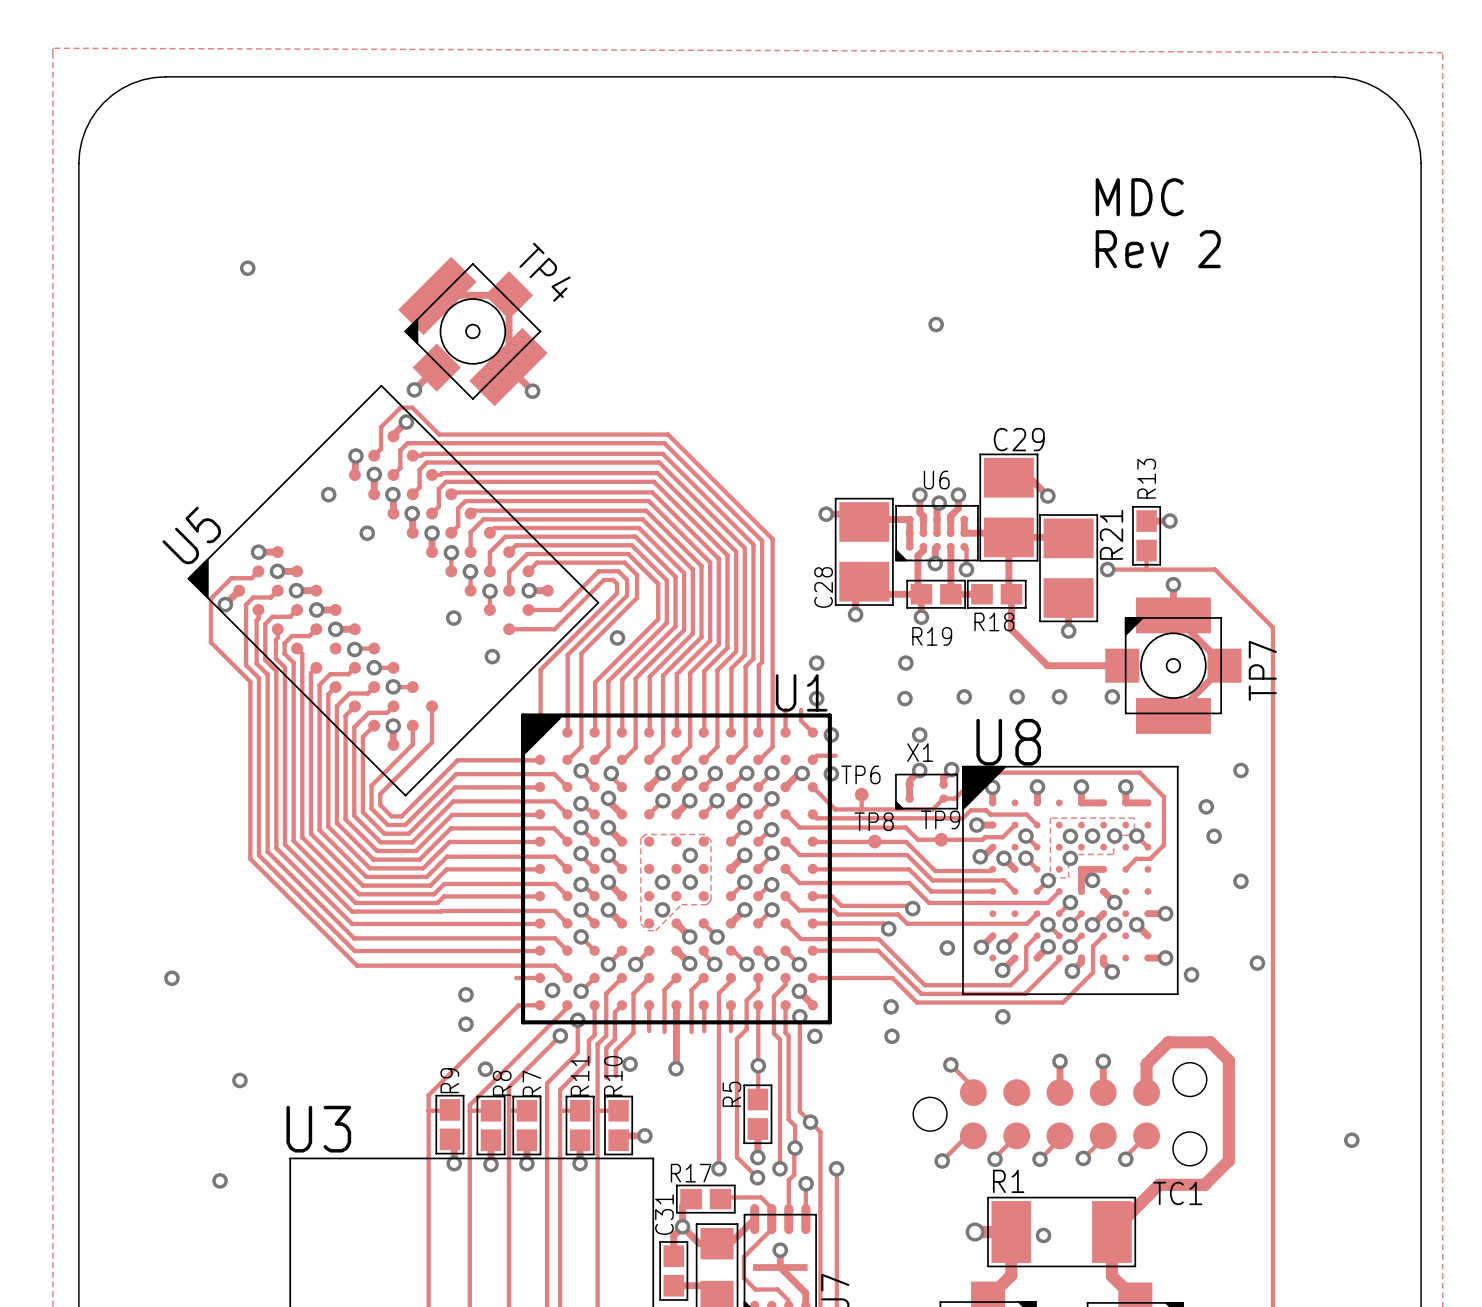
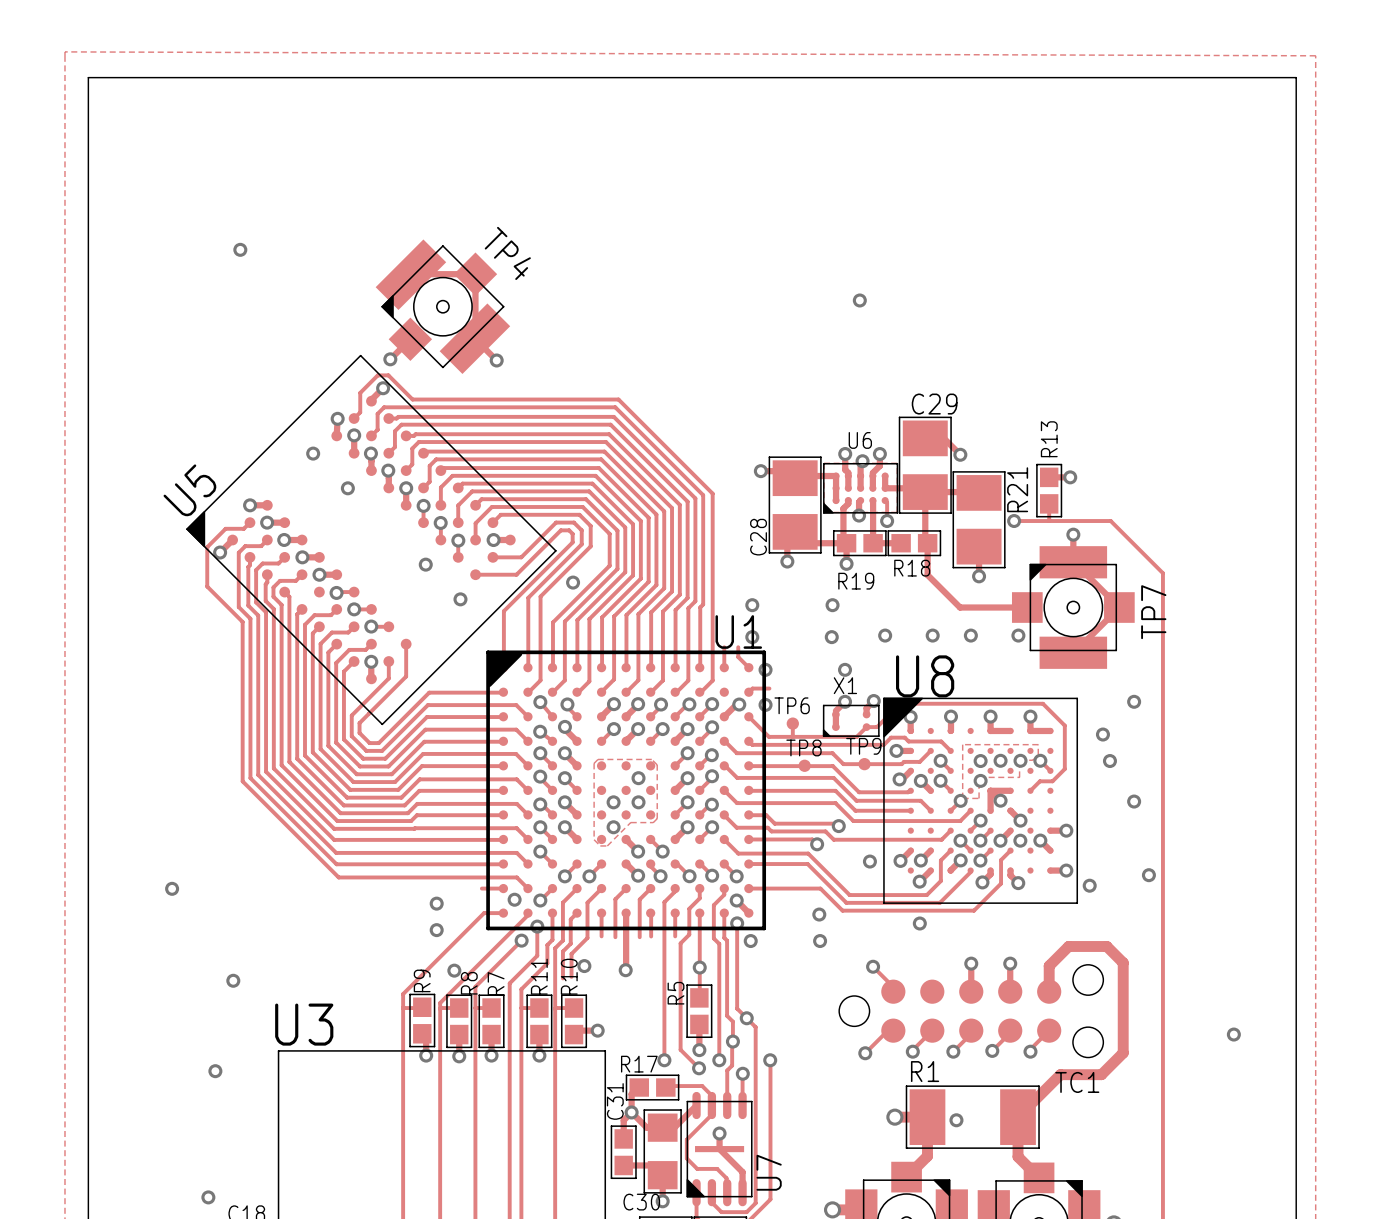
board edge: (165, 76) (132, 83) (104, 102) (85, 130) (78, 163) -> (166, 77) (88, 77) (88, 155)
board edge: (1334, 76) (1367, 83) (1395, 102) (1414, 130) (1421, 163) -> (1218, 77) (1296, 77) (1296, 155)
text: MDC (1139, 197) -> none
text: Rev 2 (1158, 249) -> none

